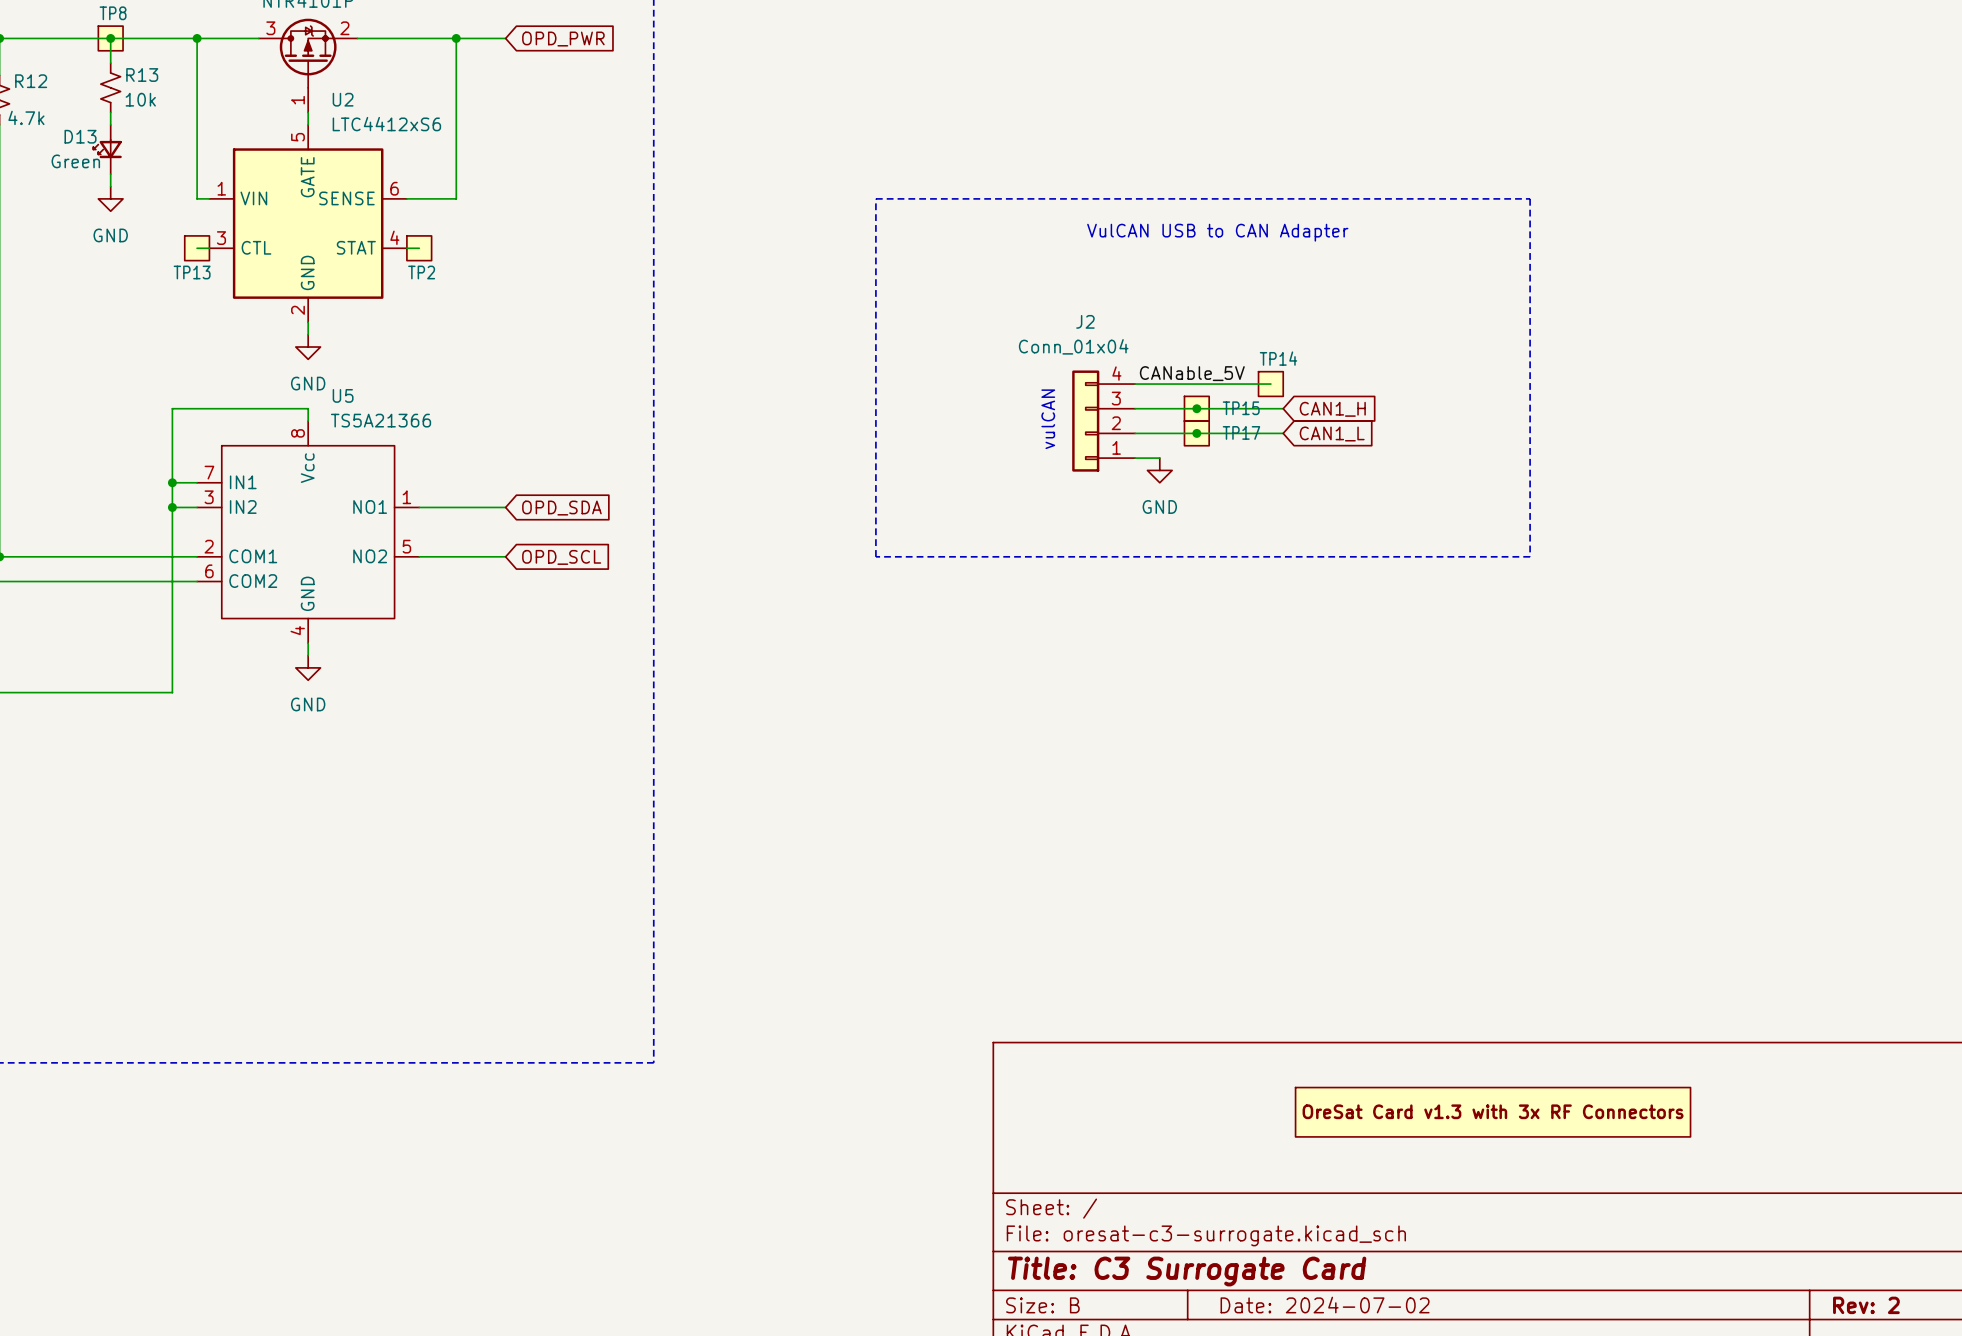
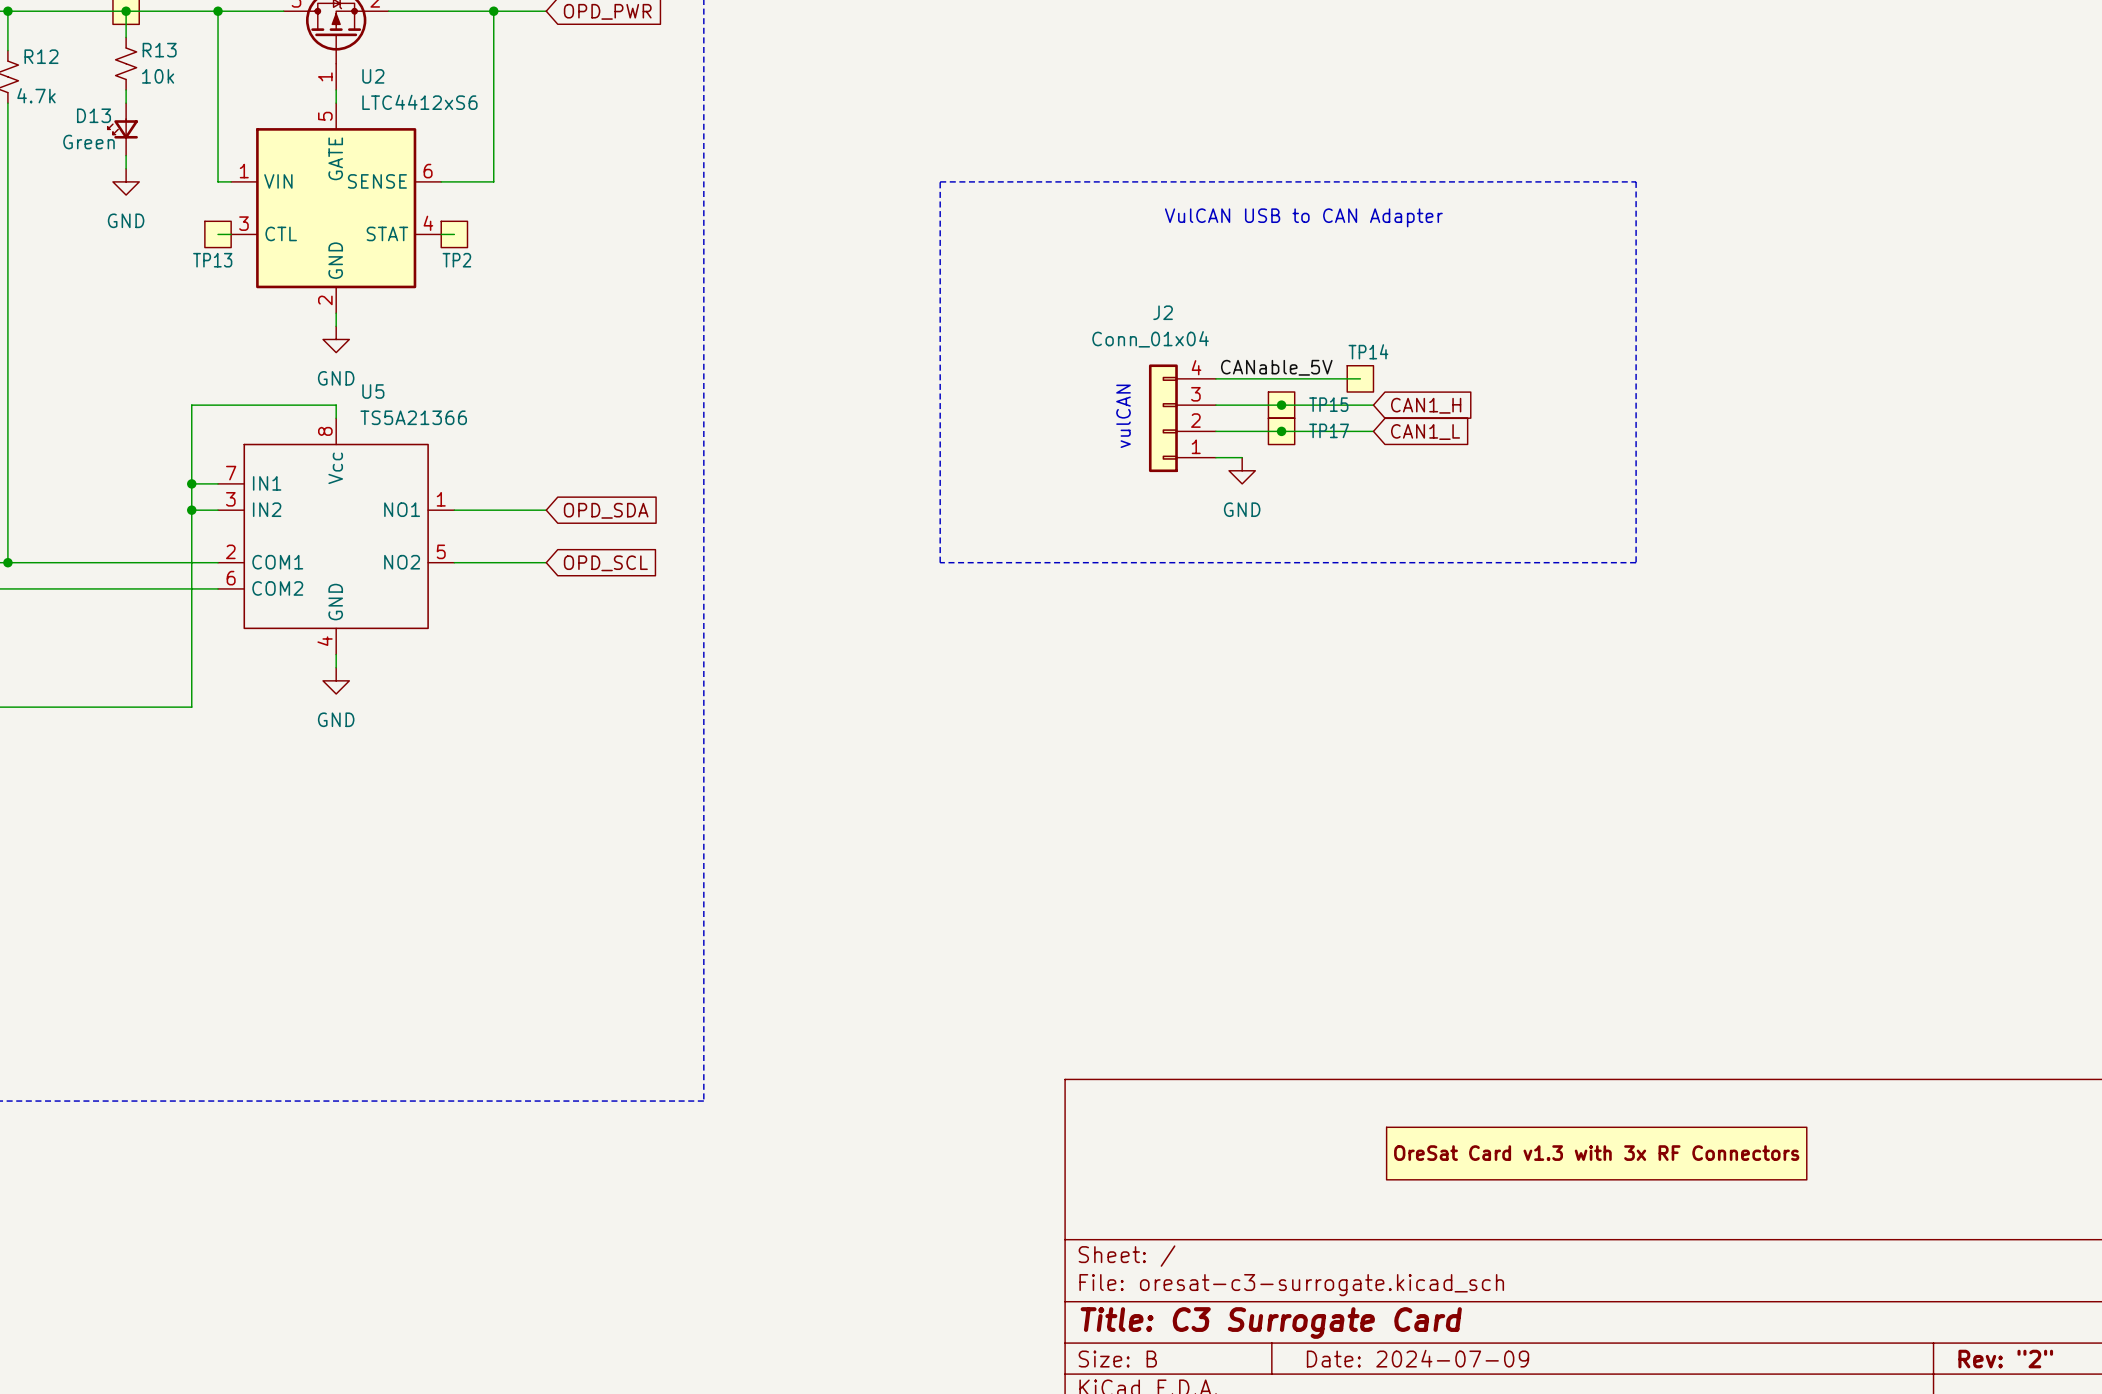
title block: Date: 2024-07-02 (1325, 1305) -> Date: 2024-07-09 (1418, 1358)
title block: Rev: 2 (1866, 1305) -> Rev: "2" (2005, 1359)

